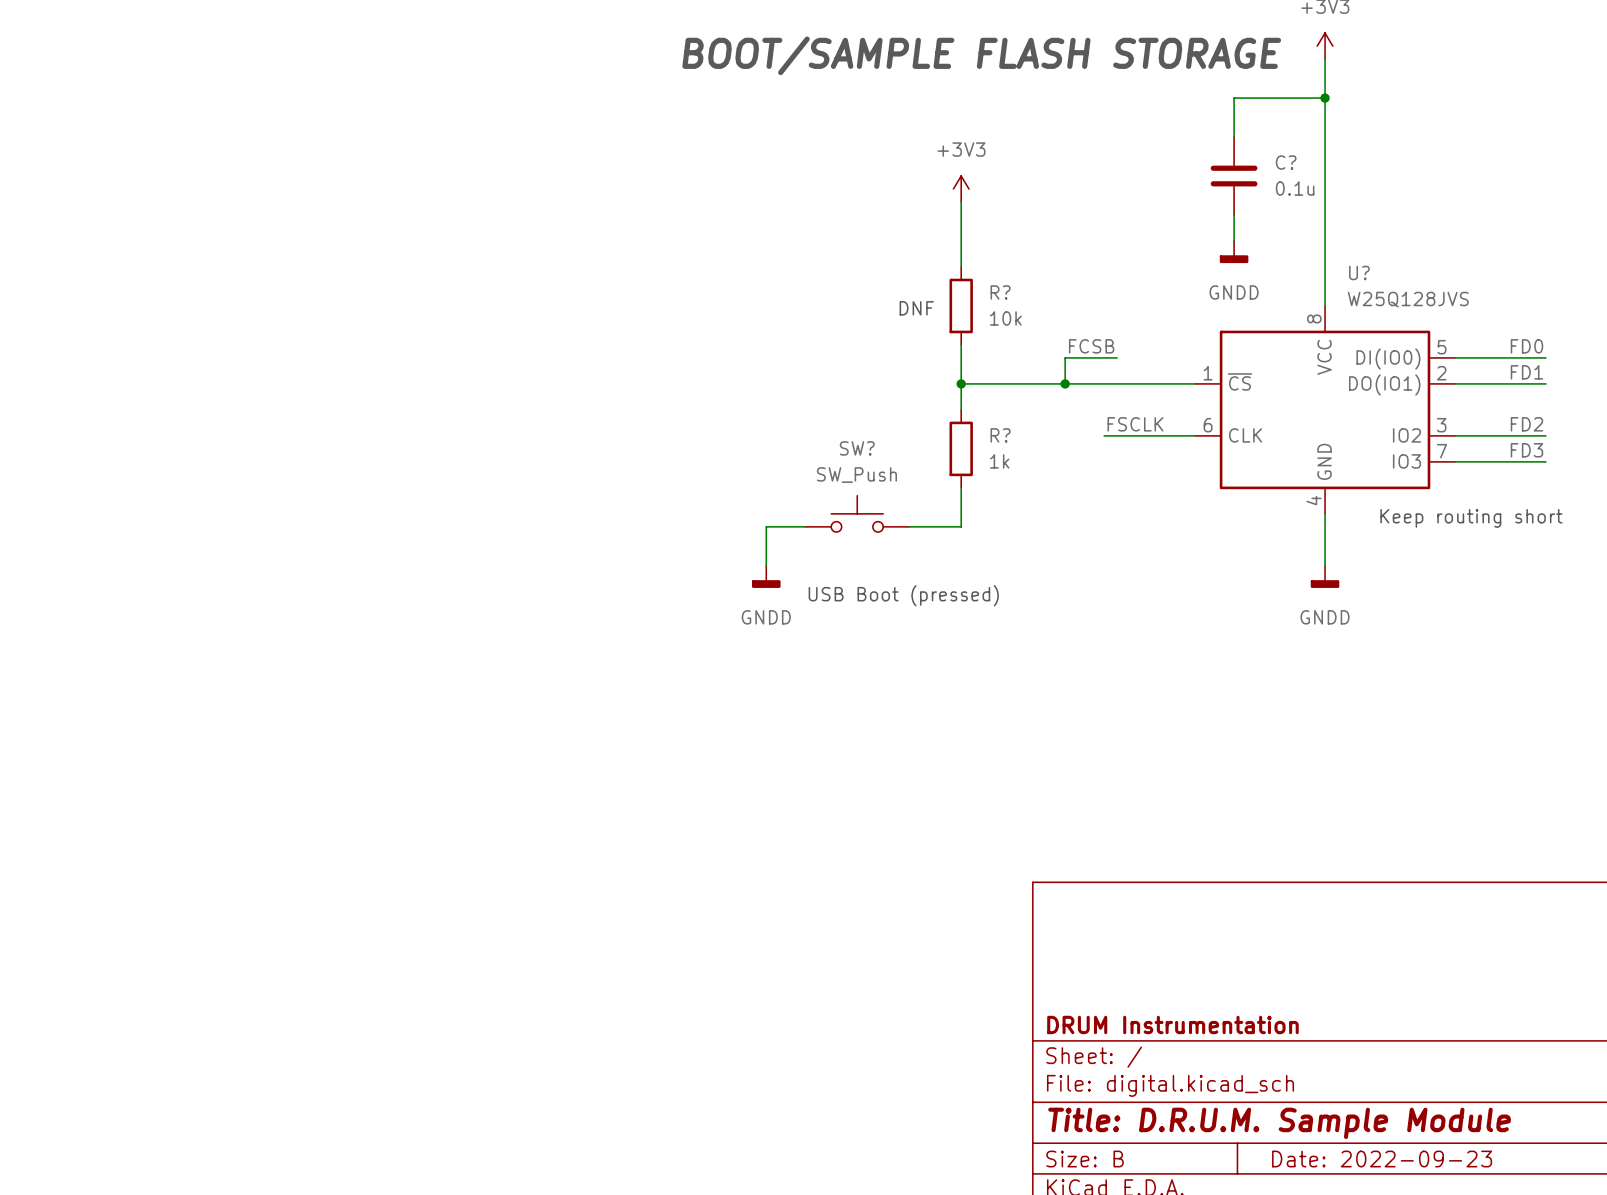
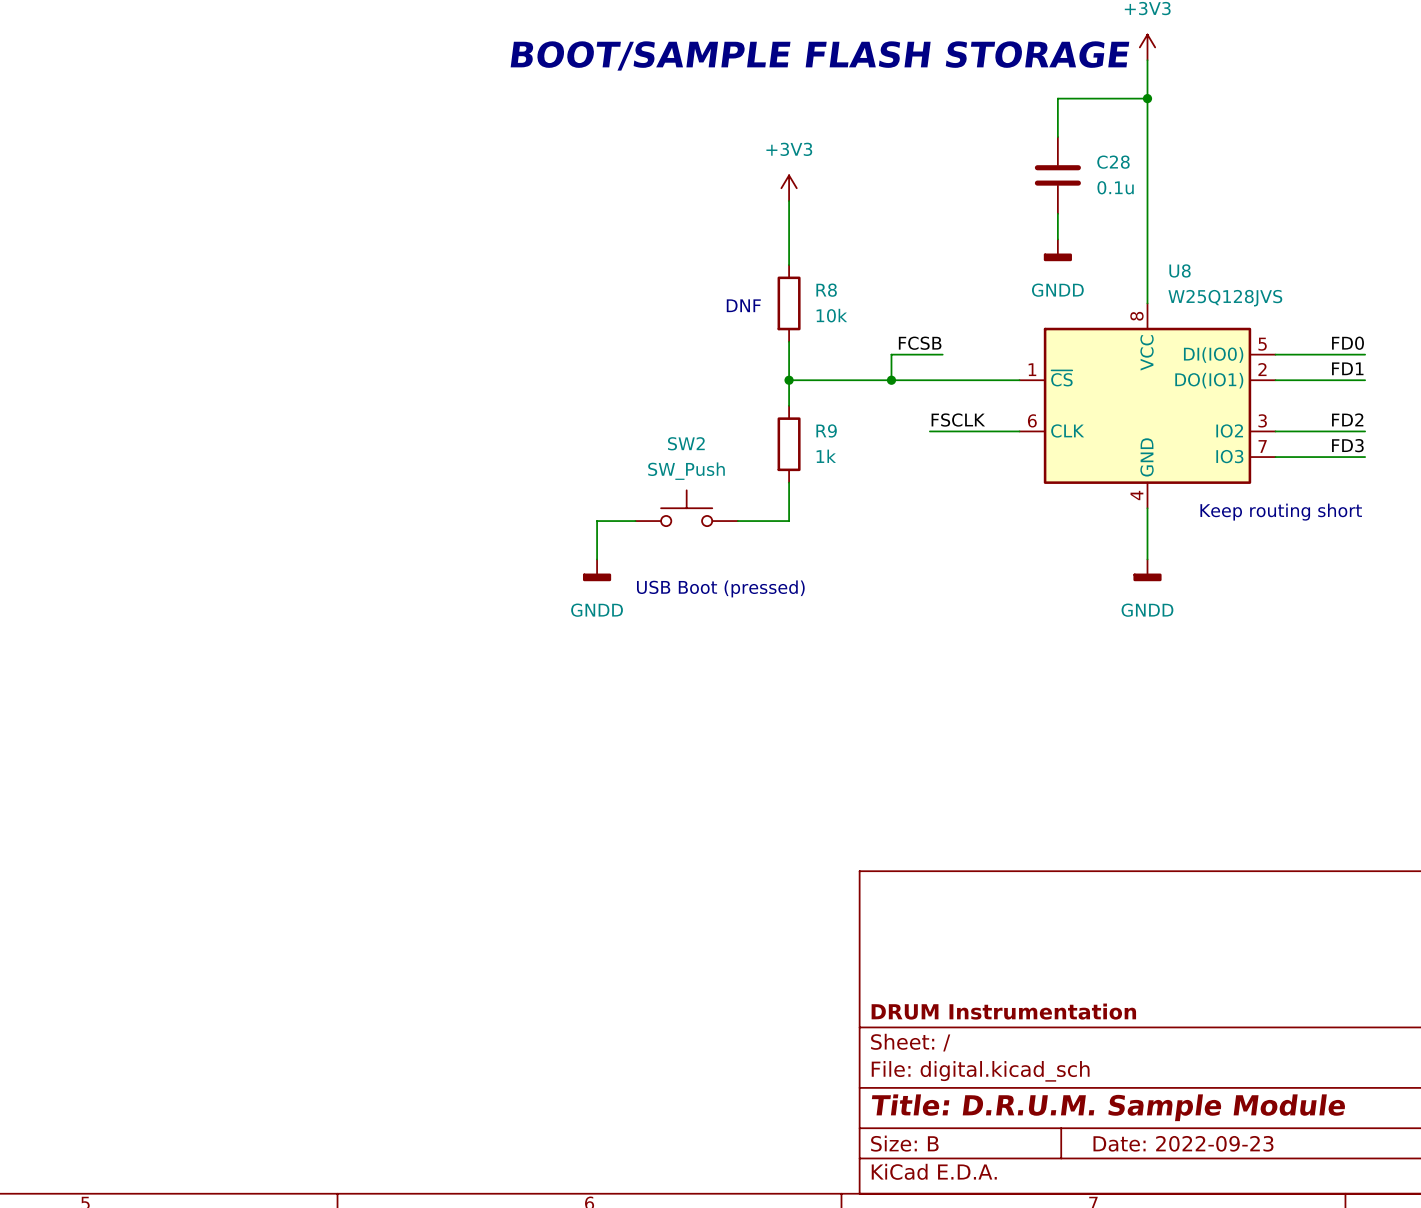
C? name: C? (1286, 162) -> C28 (1113, 162)
U? name: U? (1359, 272) -> U8 (1180, 270)
R? name: R? (1000, 292) -> R8 (826, 290)
R? name: R? (1000, 435) -> R9 (826, 430)
SW? name: SW? (857, 448) -> SW2 (686, 443)

